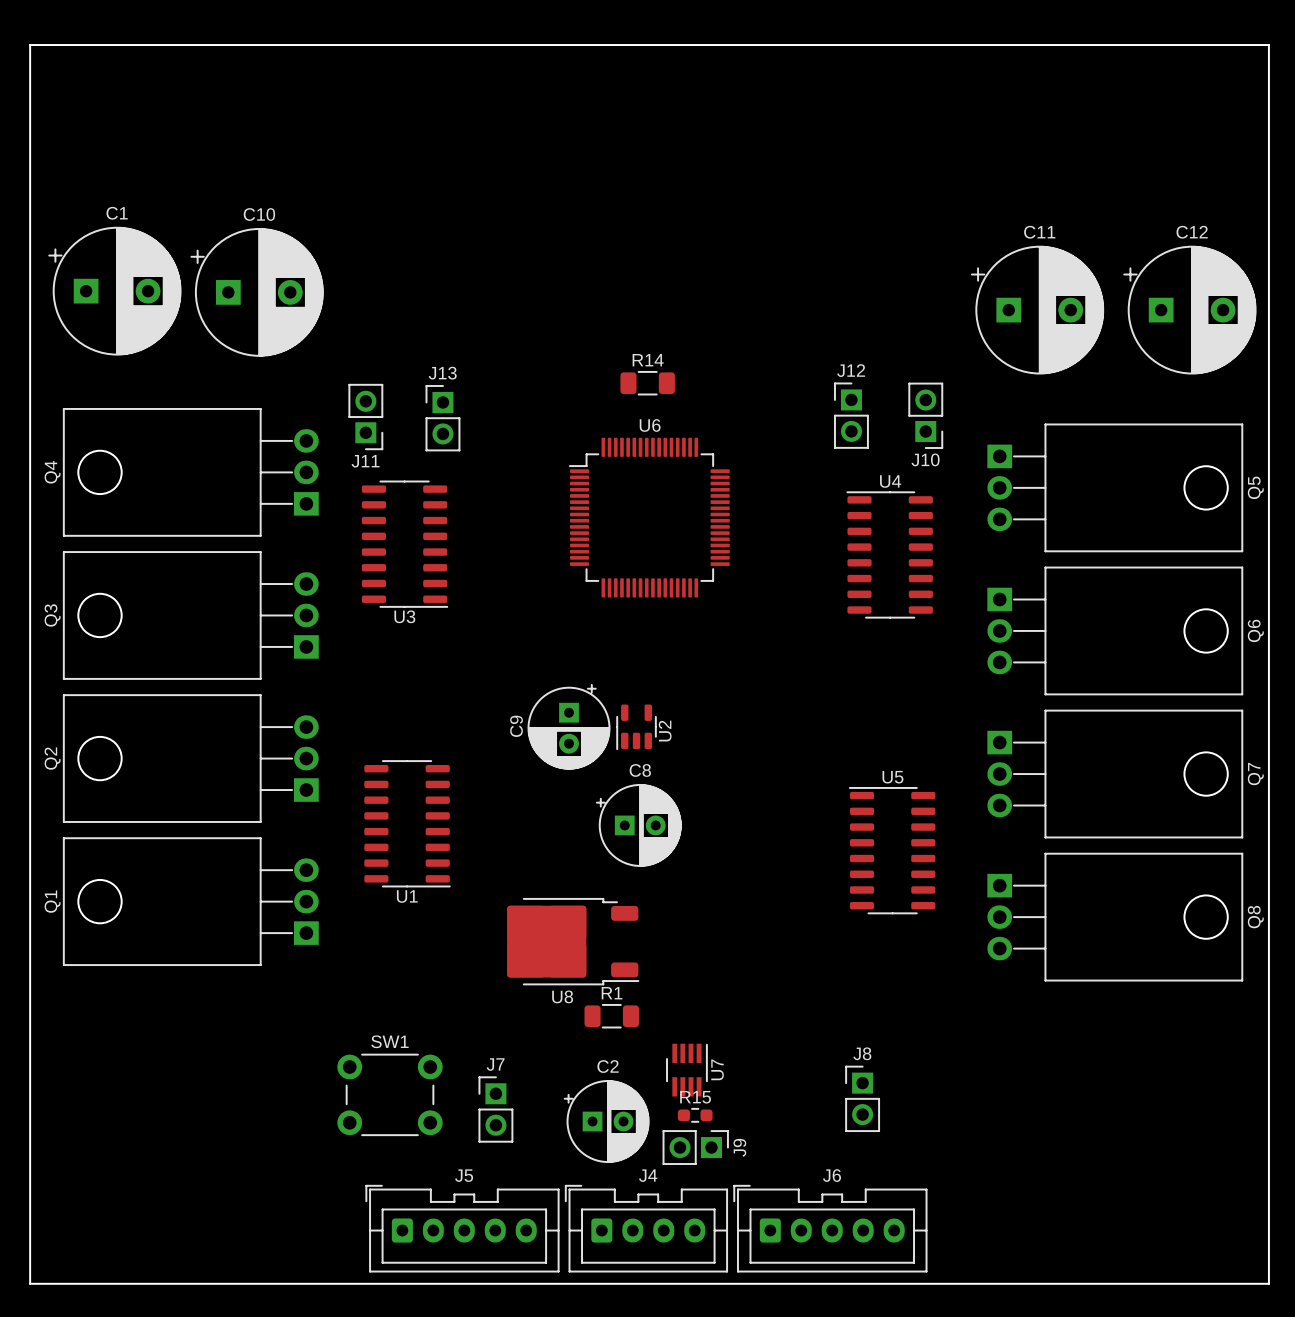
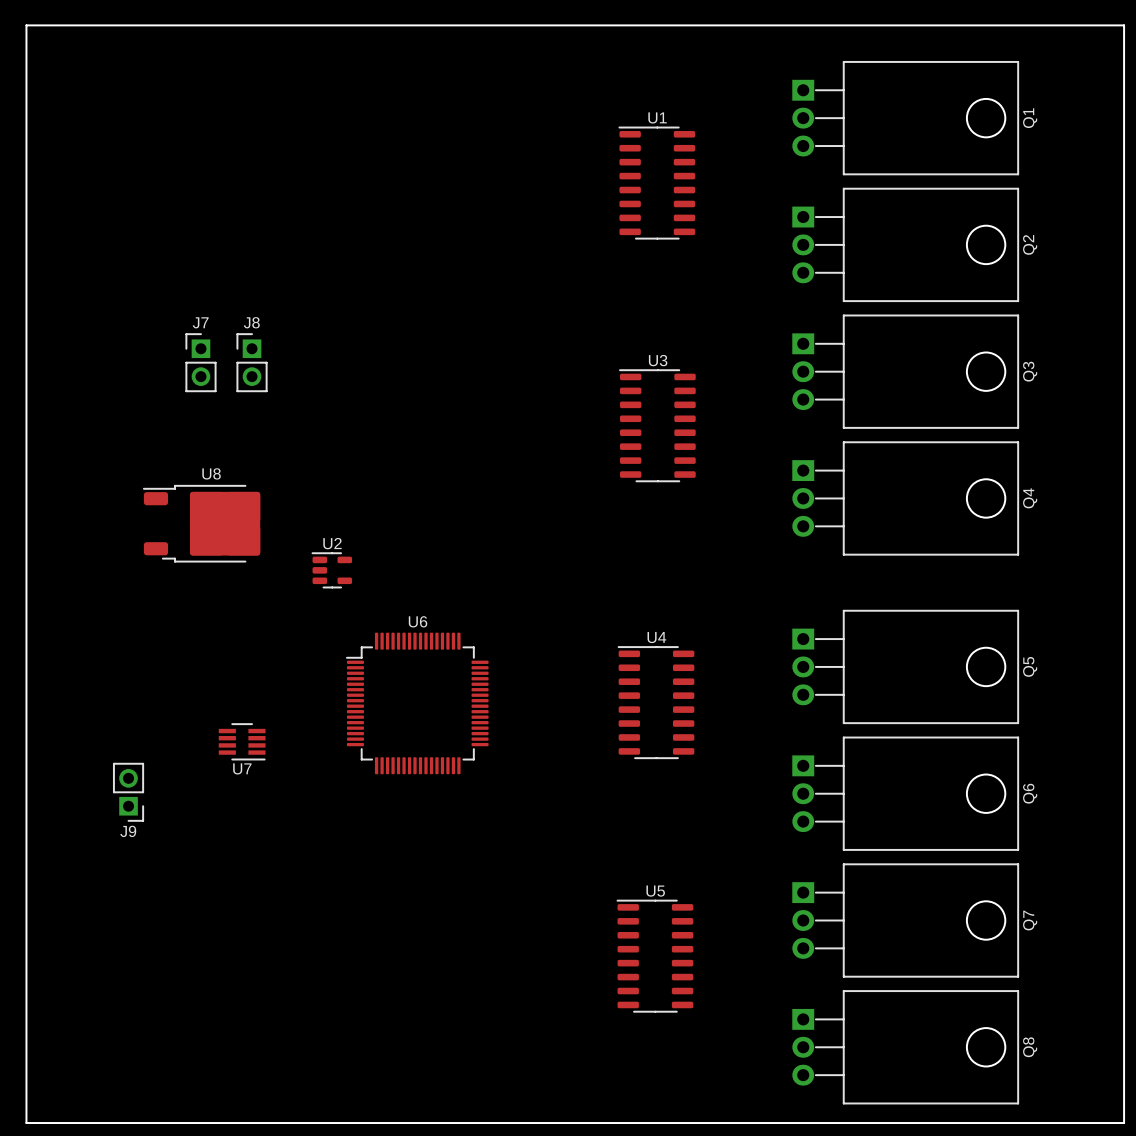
C1: (114, 291) -> none
C10: (257, 292) -> none
C11: (1037, 310) -> none
C12: (1189, 310) -> none
R14: (647, 383) -> none
J12: (851, 415) -> none
J10: (925, 415) -> none
J11: (365, 417) -> none
J13: (442, 418) -> none
Q4 rotation: 0° (190, 472) -> 180° (905, 498)
Q4 position: (190, 472) -> (905, 498)
Q5 position: (1115, 487) -> (905, 666)
U6 position: (649, 517) -> (417, 703)
U3 rotation: 0° (404, 544) -> 180° (657, 425)
U3 position: (404, 544) -> (657, 425)
U4 position: (889, 554) -> (656, 702)
Q3 rotation: 0° (190, 615) -> 180° (905, 371)
Q3 position: (190, 615) -> (905, 371)
Q6 position: (1115, 630) -> (905, 793)
C9: (569, 726) -> none
U2 rotation: 0° (636, 727) -> 90° clockwise (331, 570)
U2 position: (636, 727) -> (331, 570)
U2 name position: U2 (665, 731) -> U2 (332, 543)
Q2 rotation: 0° (190, 758) -> 180° (905, 244)
Q2 position: (190, 758) -> (905, 244)
Q7 position: (1115, 774) -> (905, 920)
U1 rotation: 0° (407, 823) -> 180° (656, 183)
U1 position: (407, 823) -> (656, 183)
C8: (638, 825) -> none
U5 position: (892, 850) -> (655, 956)
Q1 rotation: 0° (190, 901) -> 180° (905, 118)
Q1 position: (190, 901) -> (905, 118)
Q8 position: (1115, 917) -> (905, 1047)
U8 rotation: 0° (573, 941) -> 180° (201, 523)
U8 position: (573, 941) -> (201, 523)
R1: (611, 1016) -> none
U7 rotation: 0° (686, 1070) -> 90° clockwise (242, 741)
U7 position: (686, 1070) -> (242, 741)
SW1: (390, 1094) -> none
J8 position: (862, 1098) -> (252, 362)
J7 position: (495, 1109) -> (200, 362)
R15: (695, 1115) -> none
C2: (606, 1121) -> none
J9 rotation: 0° (695, 1147) -> 90° clockwise (128, 792)
J9 position: (695, 1147) -> (128, 792)
J5: (462, 1228) -> none
J4: (646, 1228) -> none
J6: (830, 1228) -> none

